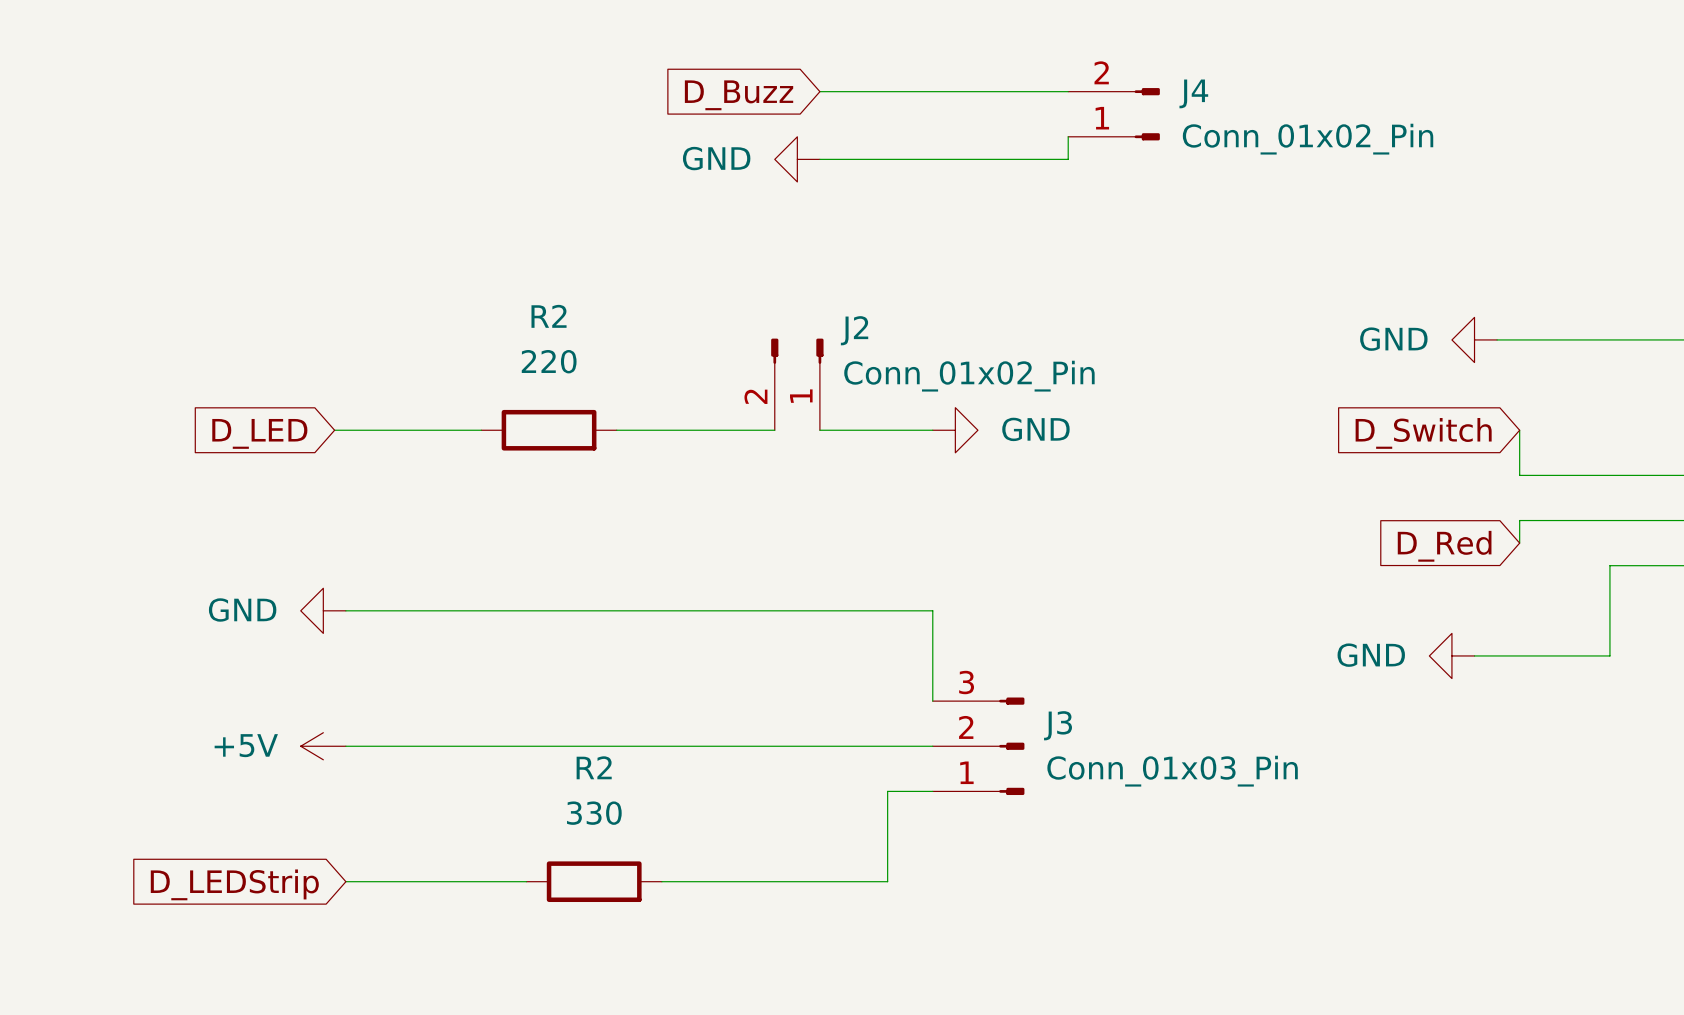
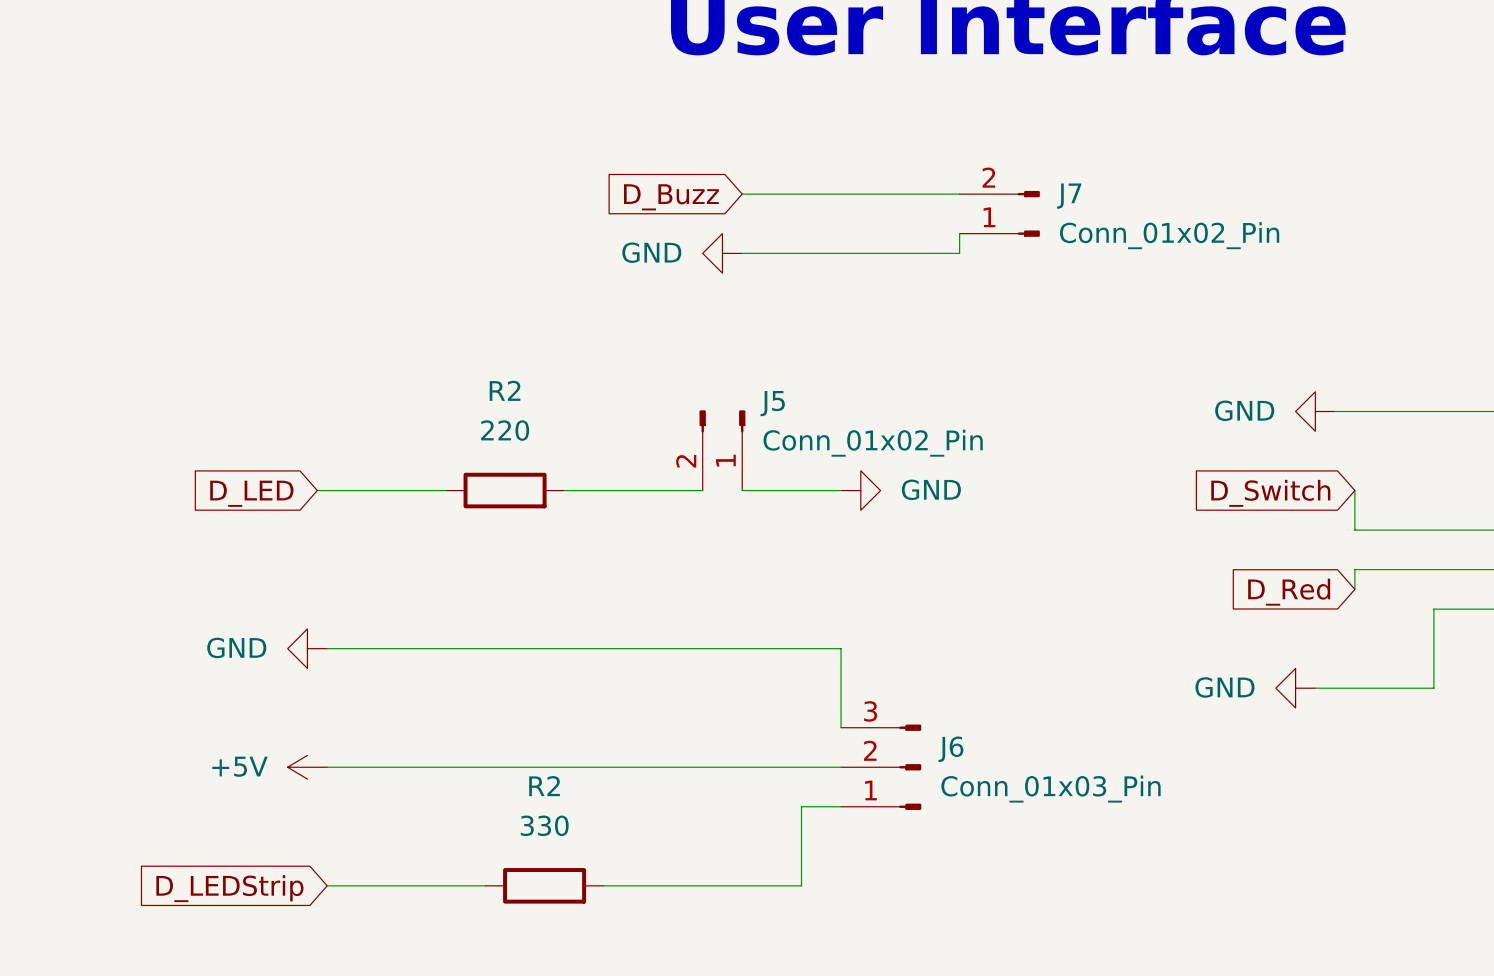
J4 name: J4 (1193, 93) -> J7 (1069, 196)
J2 name: J2 (854, 330) -> J5 (772, 403)
J3 name: J3 (1058, 725) -> J6 (950, 749)

